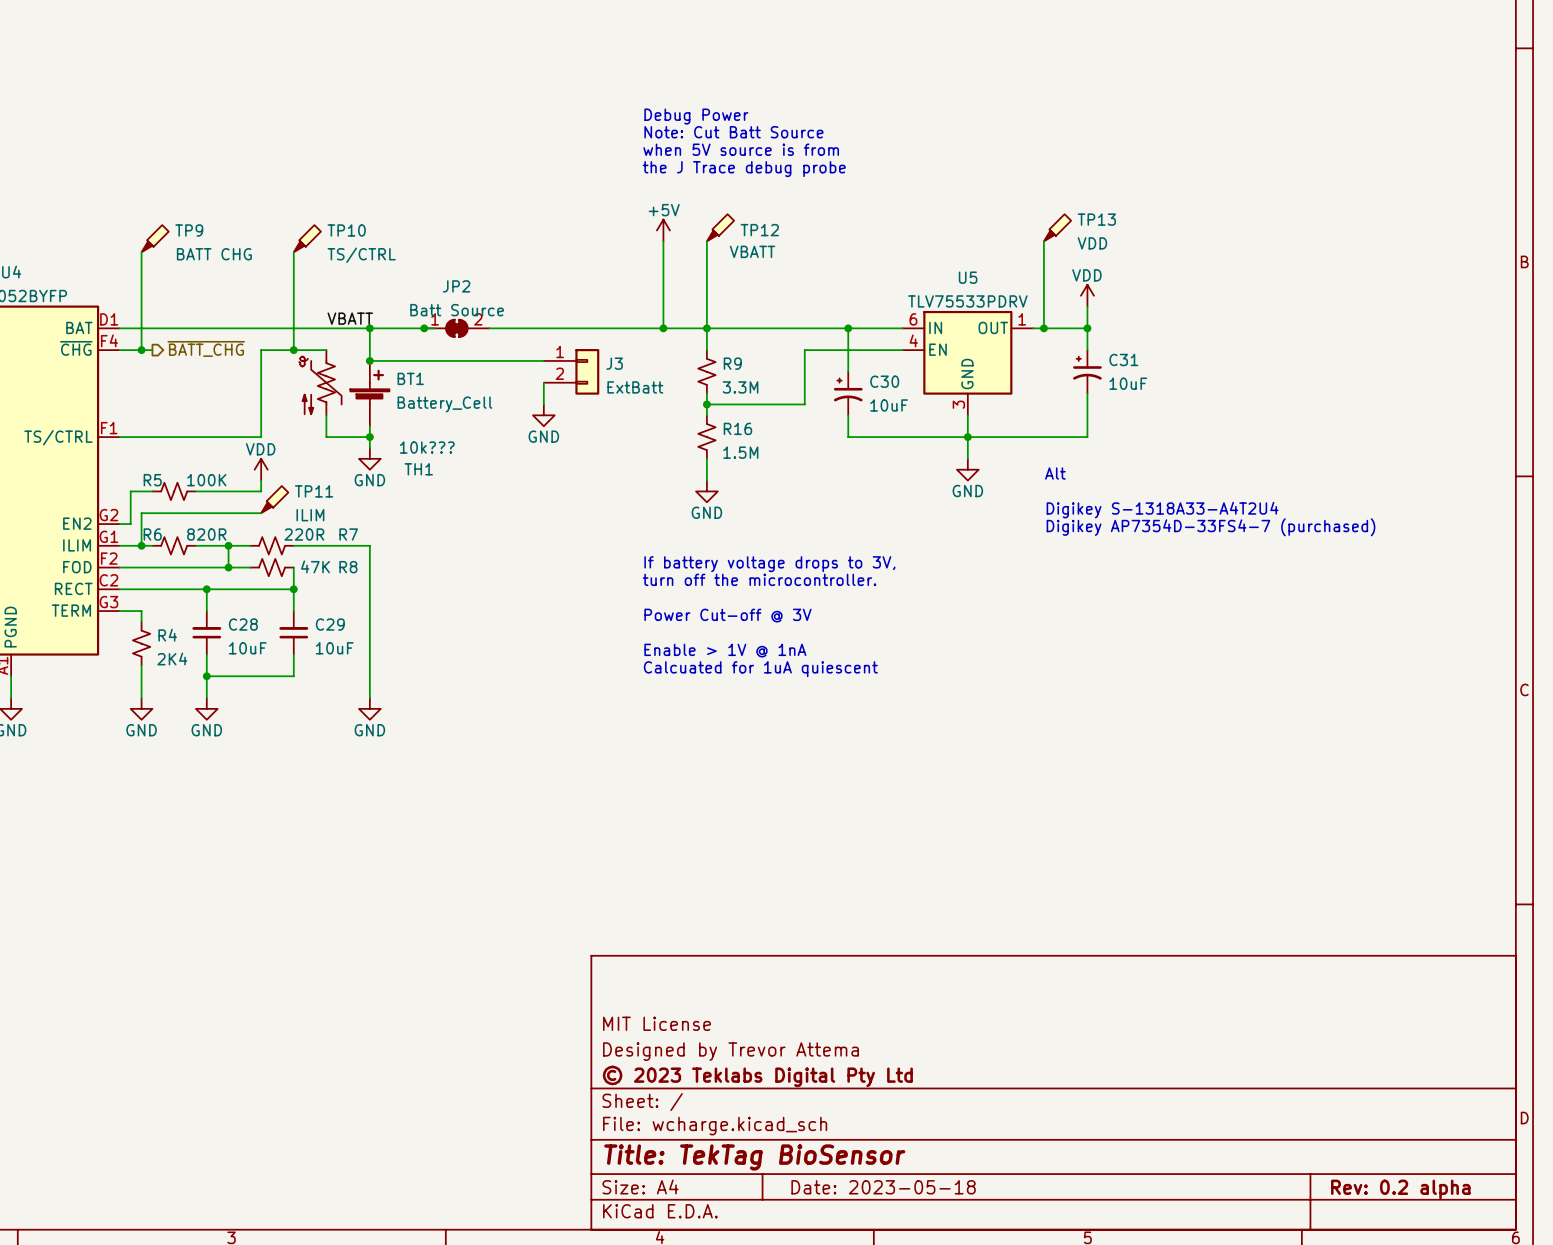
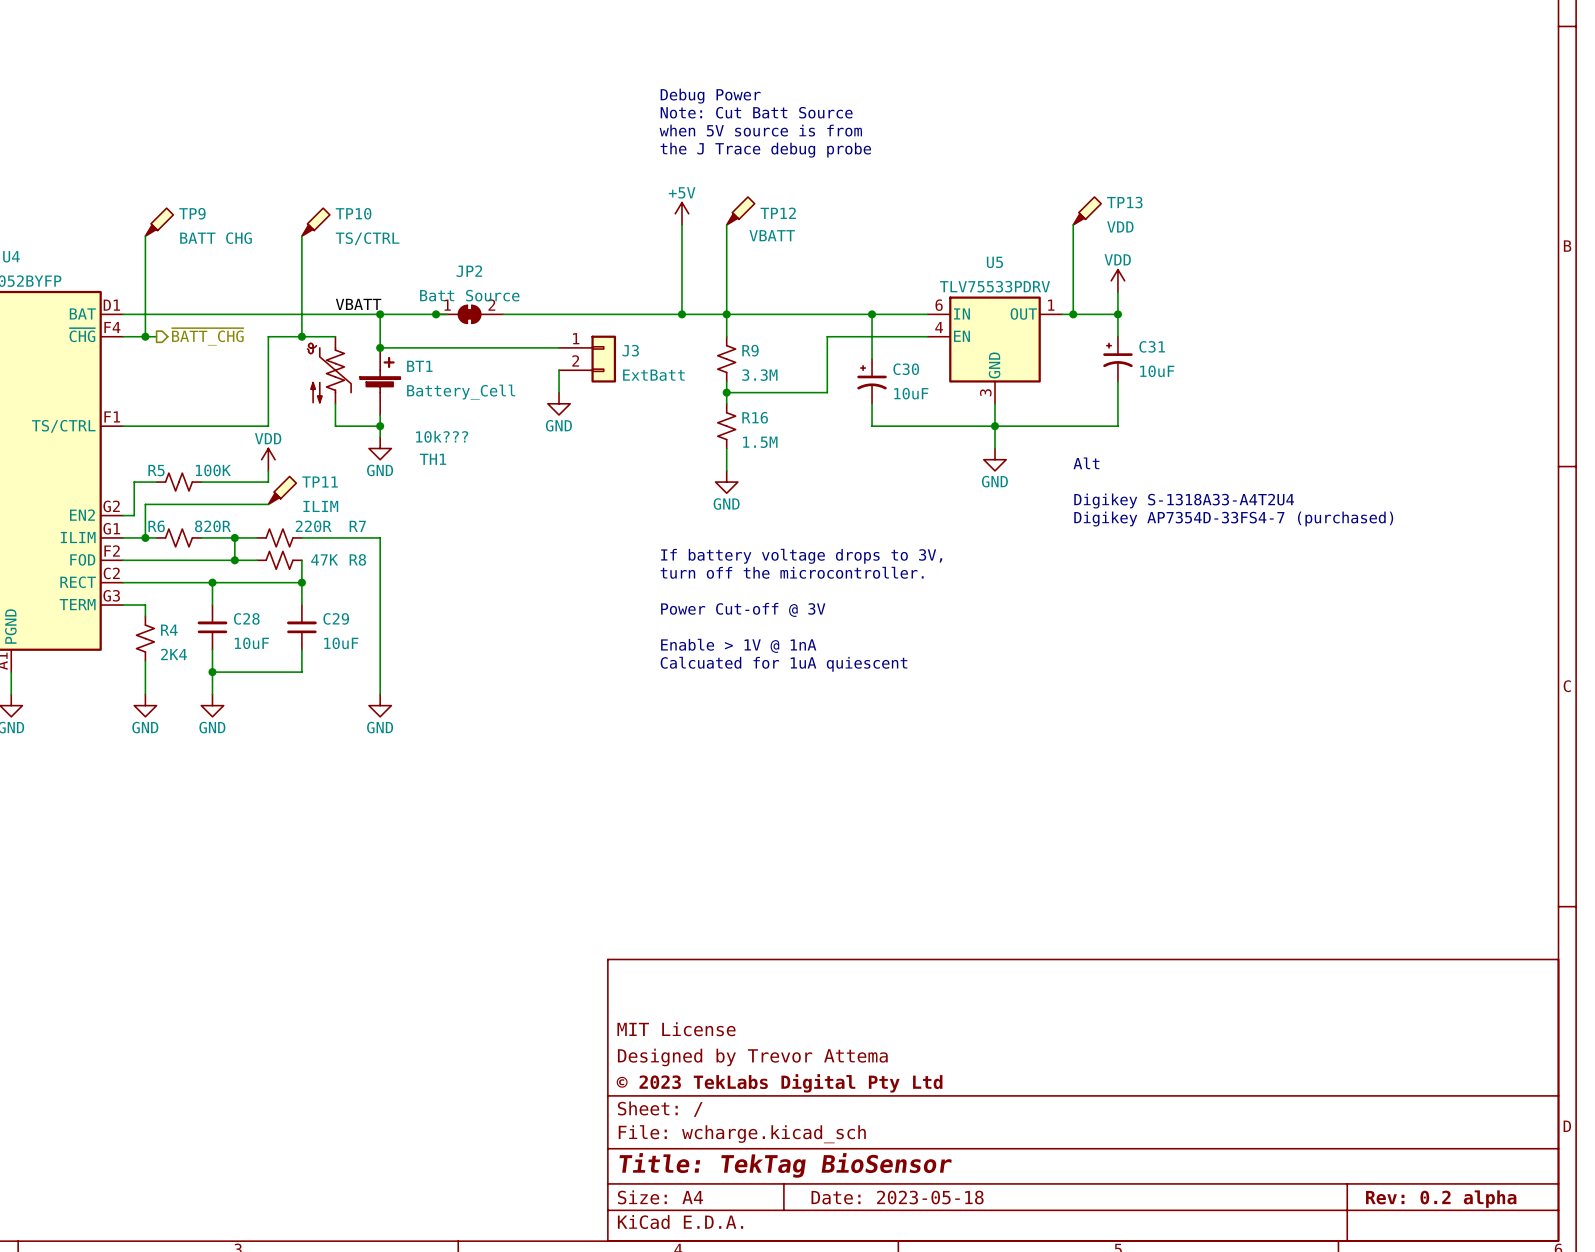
title block: © 2023 Teklabs Digital Pty Ltd (757, 1076) -> © 2023 TekLabs Digital Pty Ltd (779, 1083)

